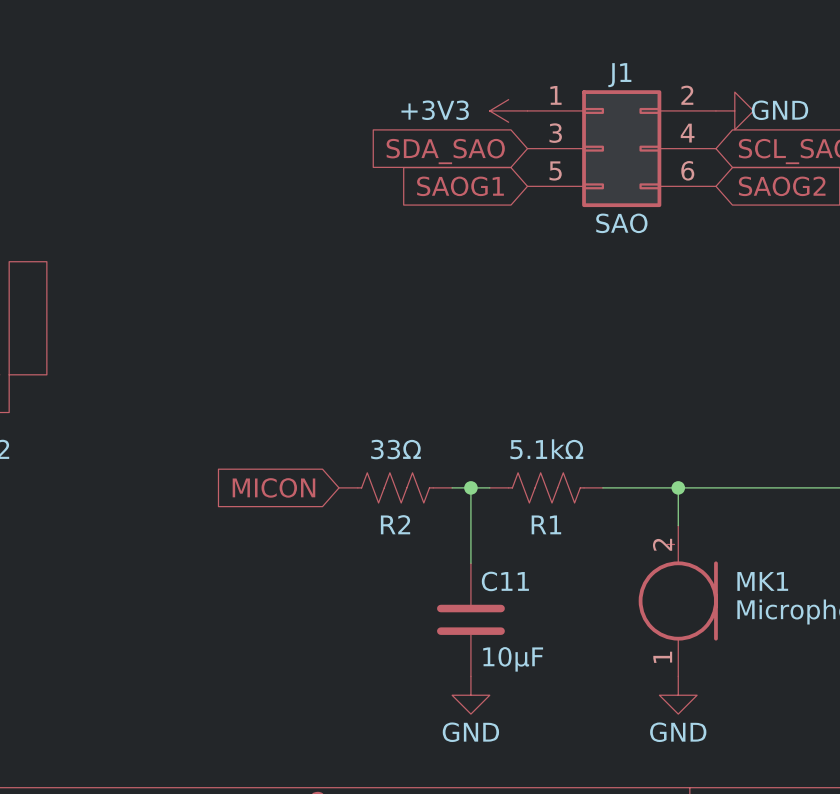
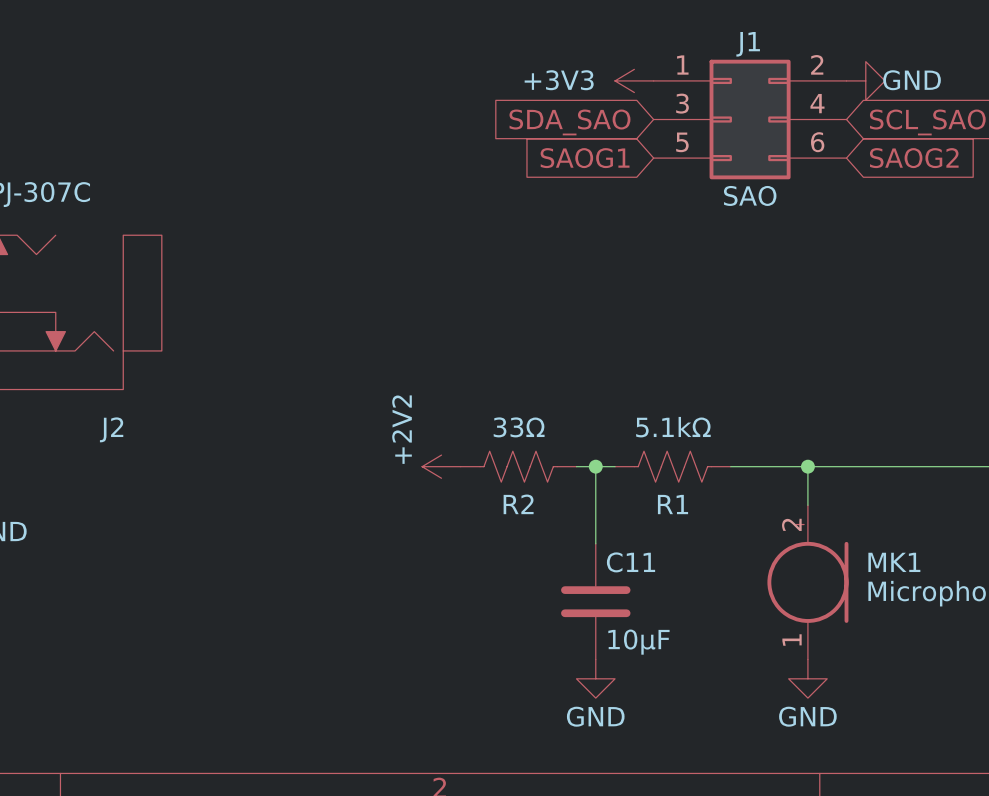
global label: MICON (273, 487) -> none
power symbol: none -> +2V2 (441, 466)

